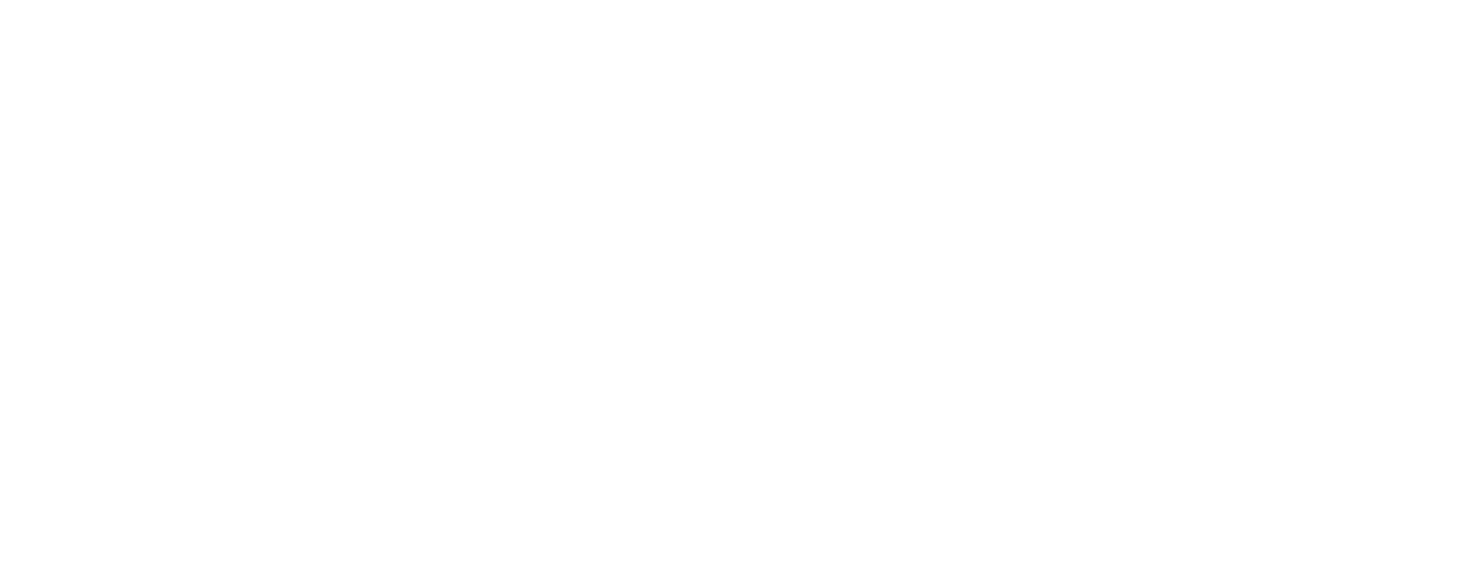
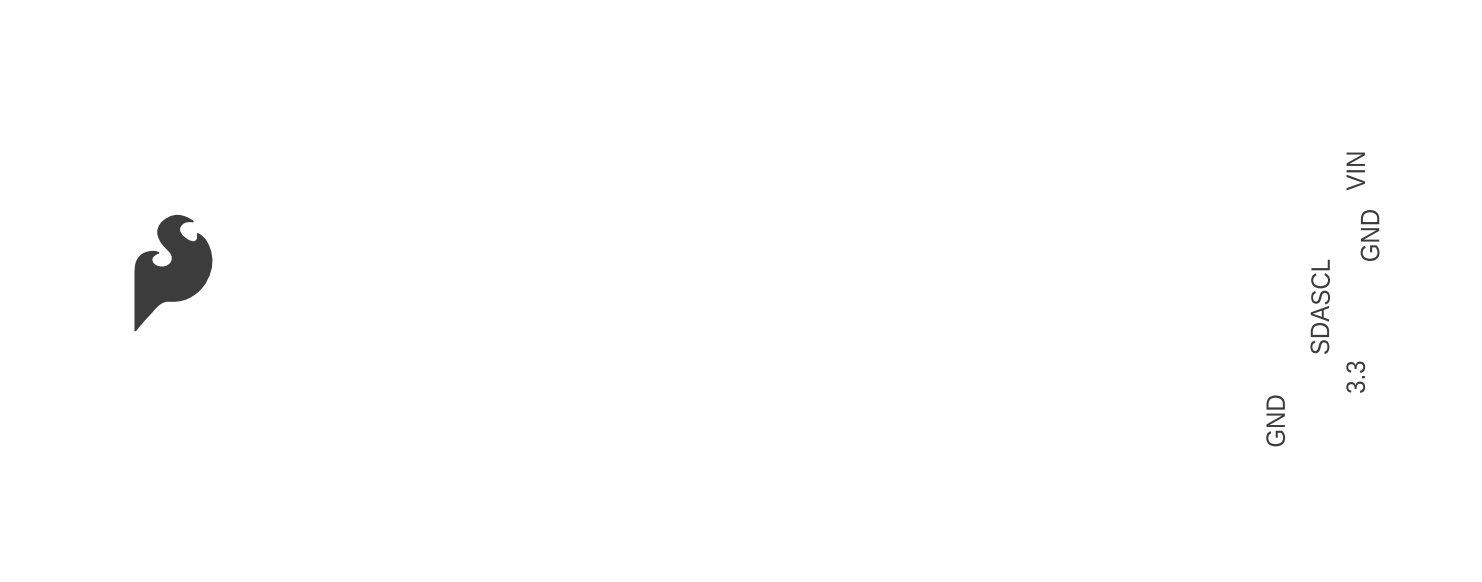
text: none -> VIN (1355, 171)
drawing: none -> [134, 214, 213, 332]
text: none -> GND (1370, 235)
text: none -> SCL (1320, 282)
text: none -> SDA (1319, 329)
text: none -> 3.3 (1355, 377)
text: none -> GND (1275, 420)

